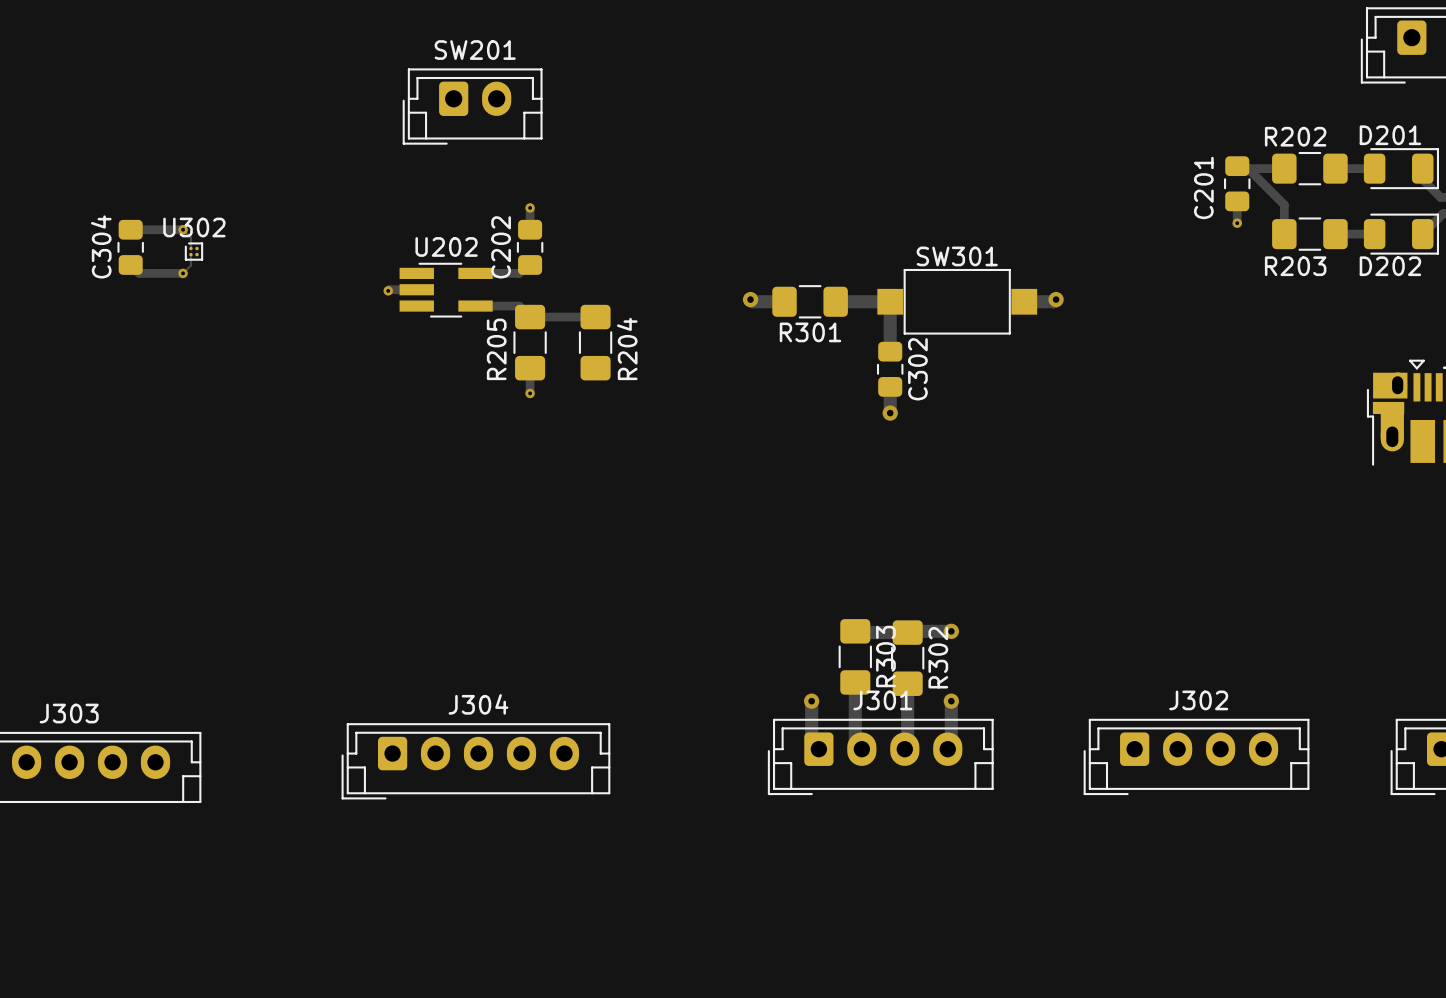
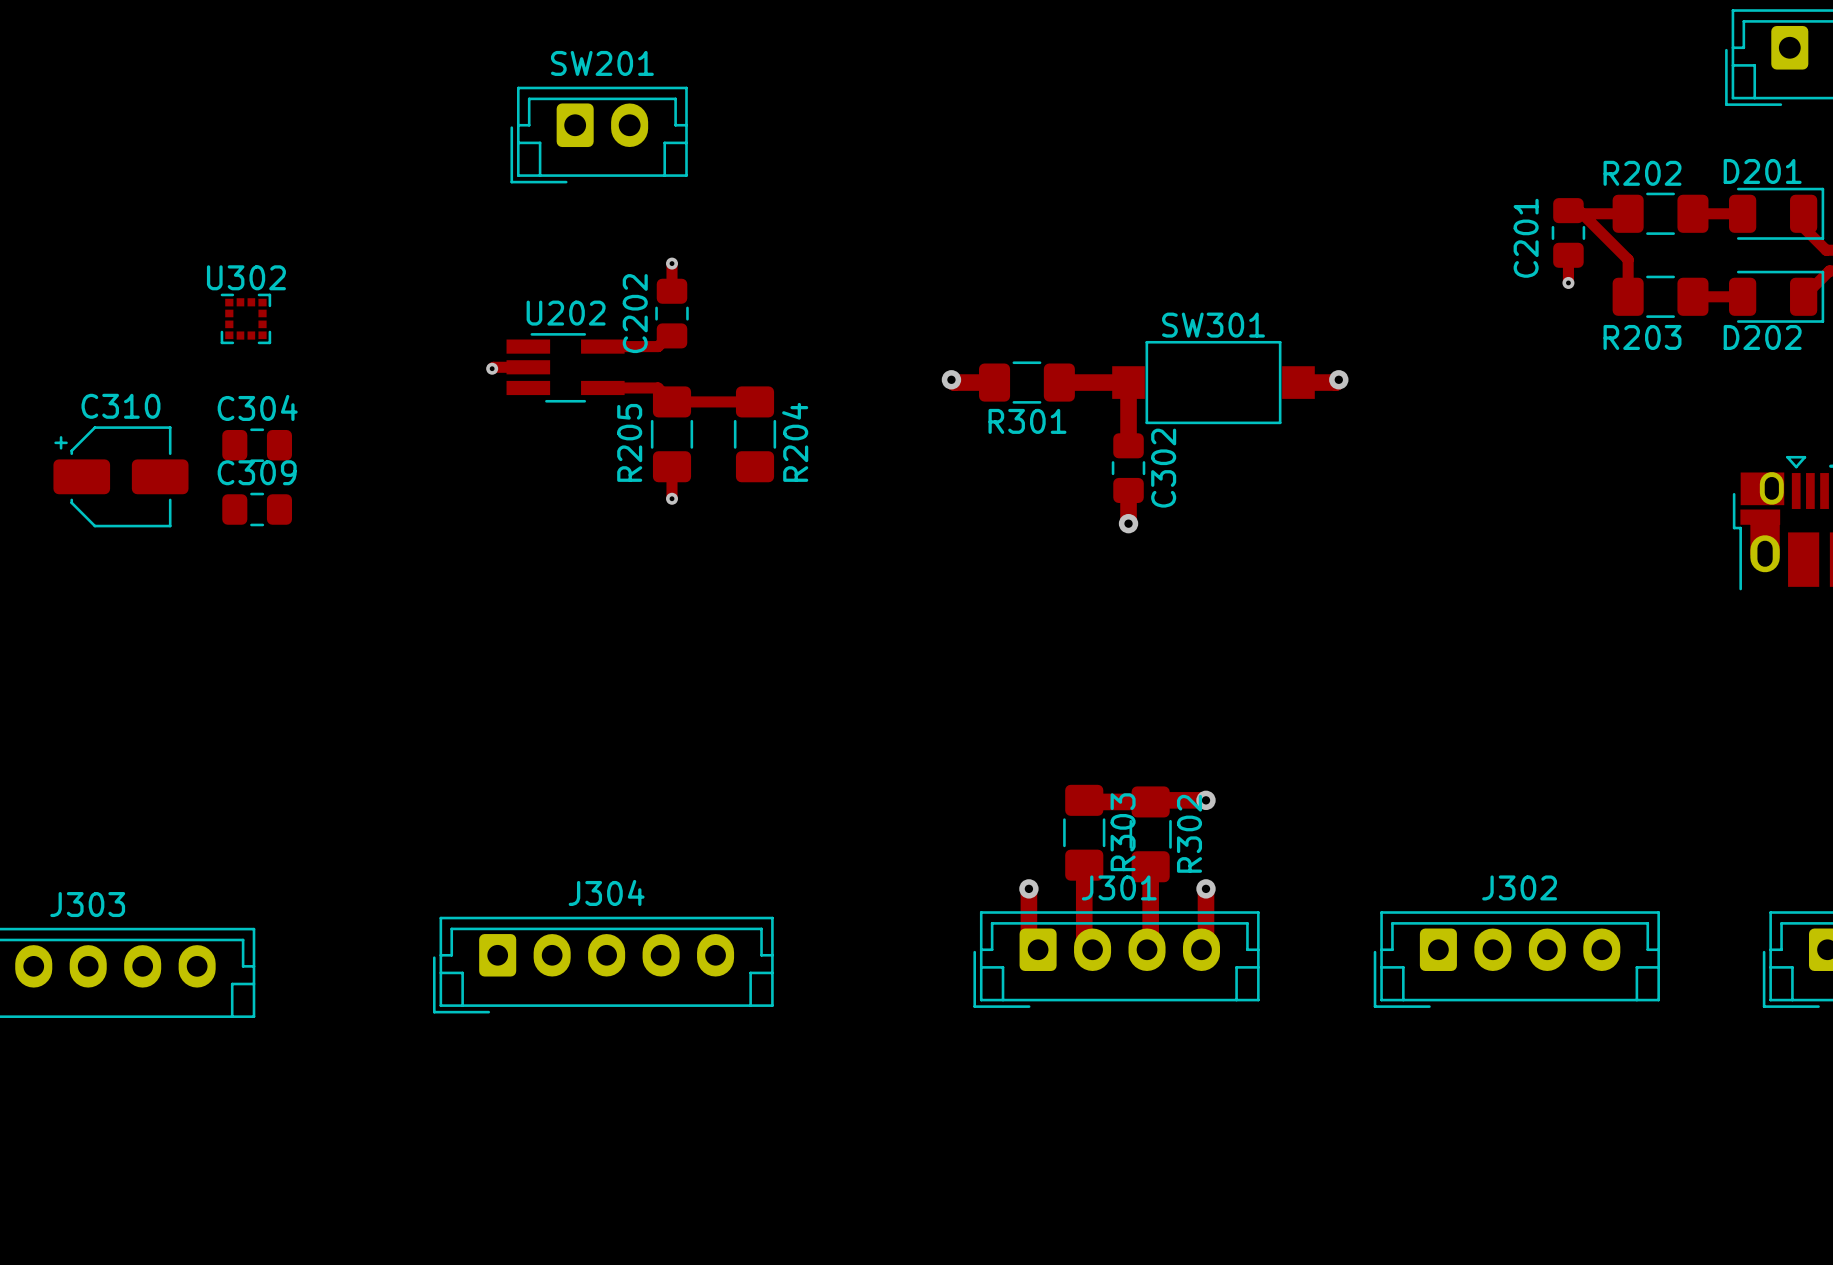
track: (130, 229) (183, 229) (190, 237) (190, 248) -> none
via: (183, 229) -> none
U302 footprint: [184, 242, 204, 261] -> [220, 293, 272, 345]
C304 rotation: 0° (130, 247) -> 90° clockwise (257, 445)
C304 position: (130, 247) -> (257, 445)
track: (190, 254) (190, 265) (183, 273) (139, 273) (130, 264) -> none
via: (183, 273) -> none
C310: none -> (120, 476)
C309: none -> (257, 509)

